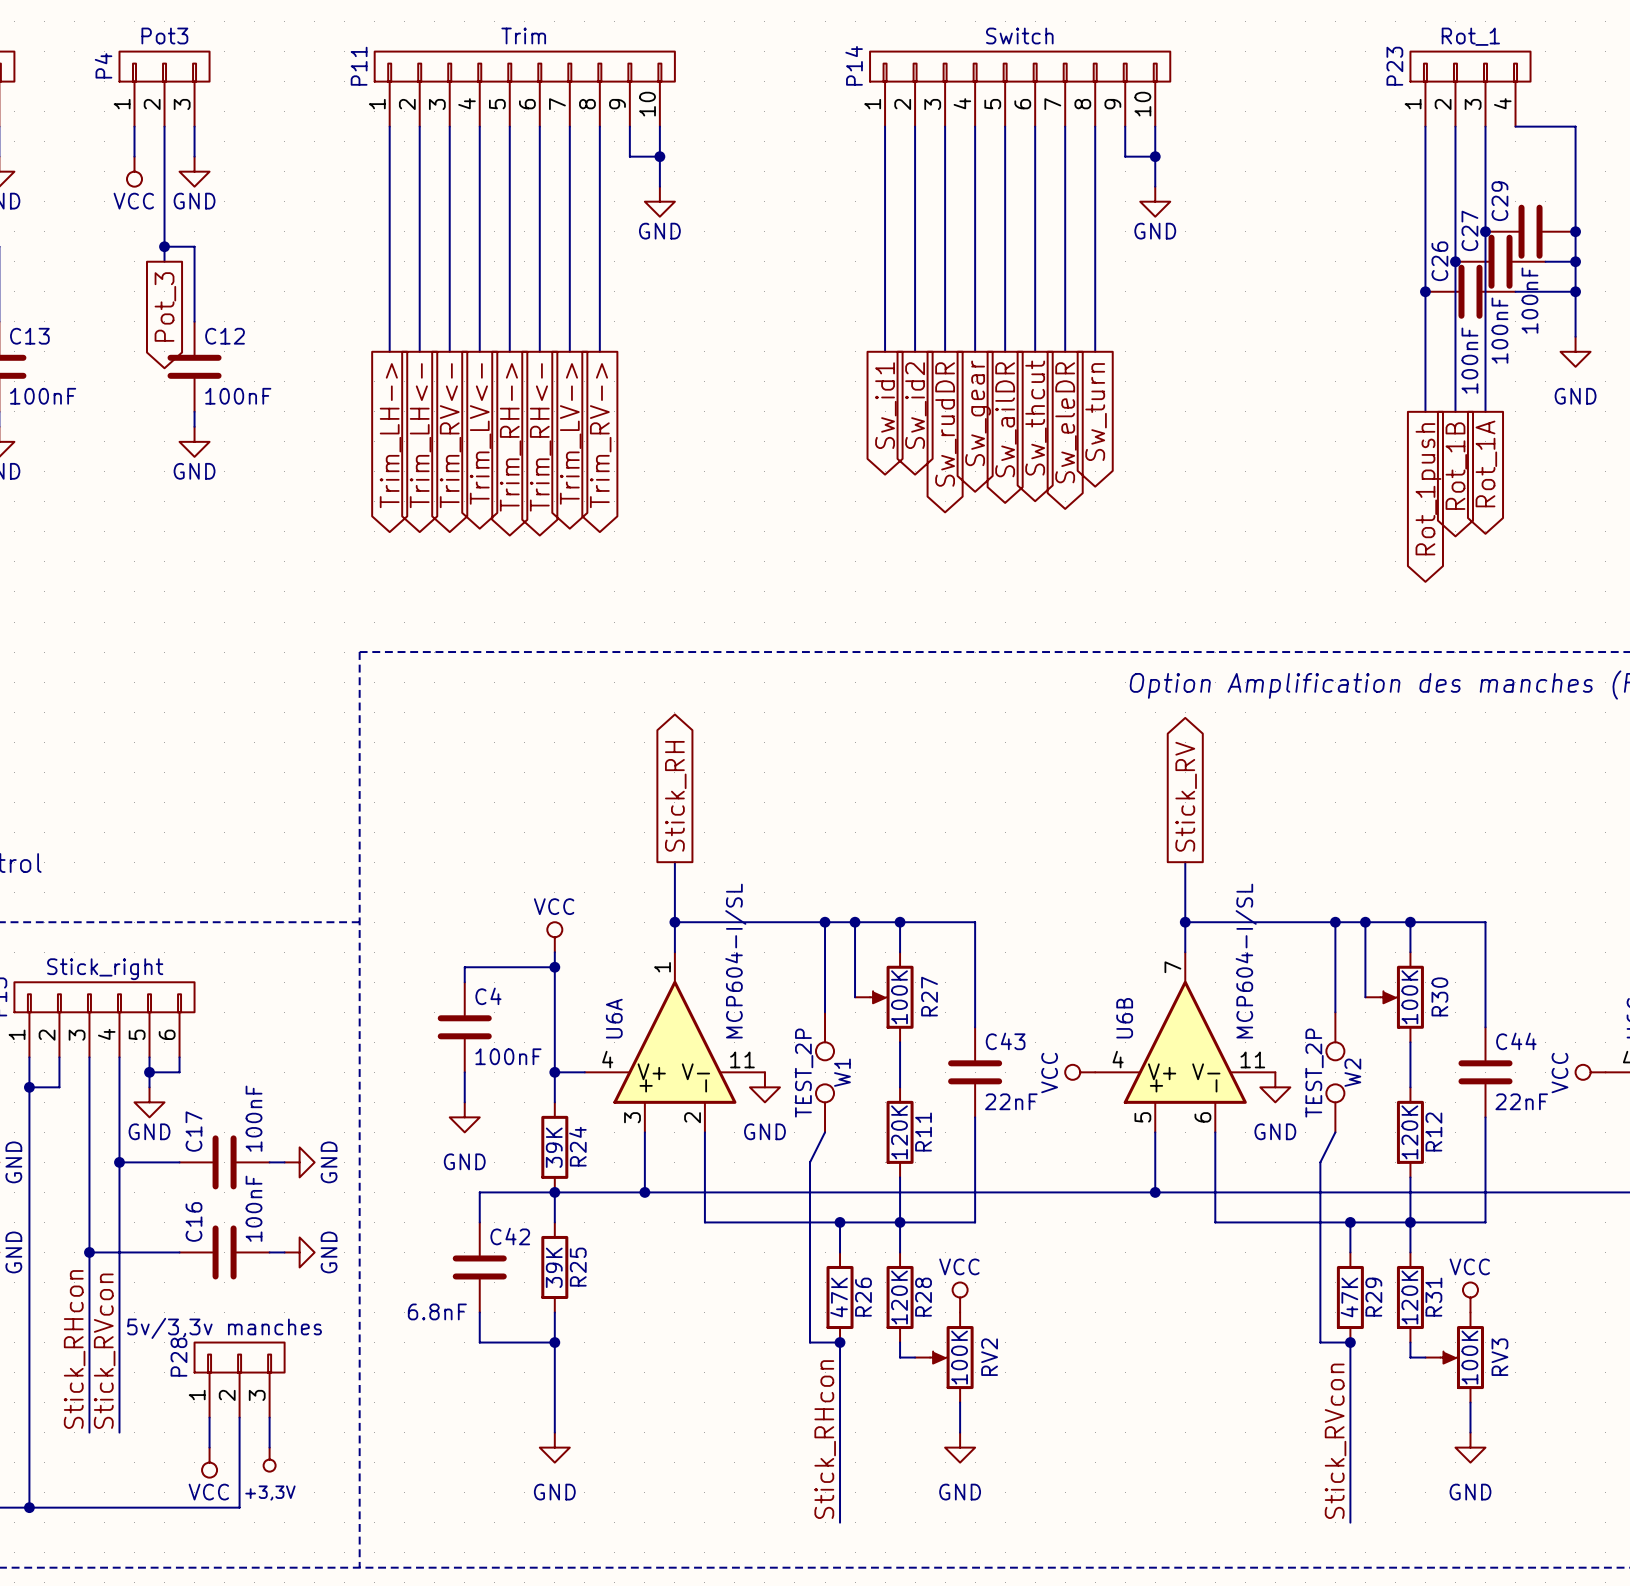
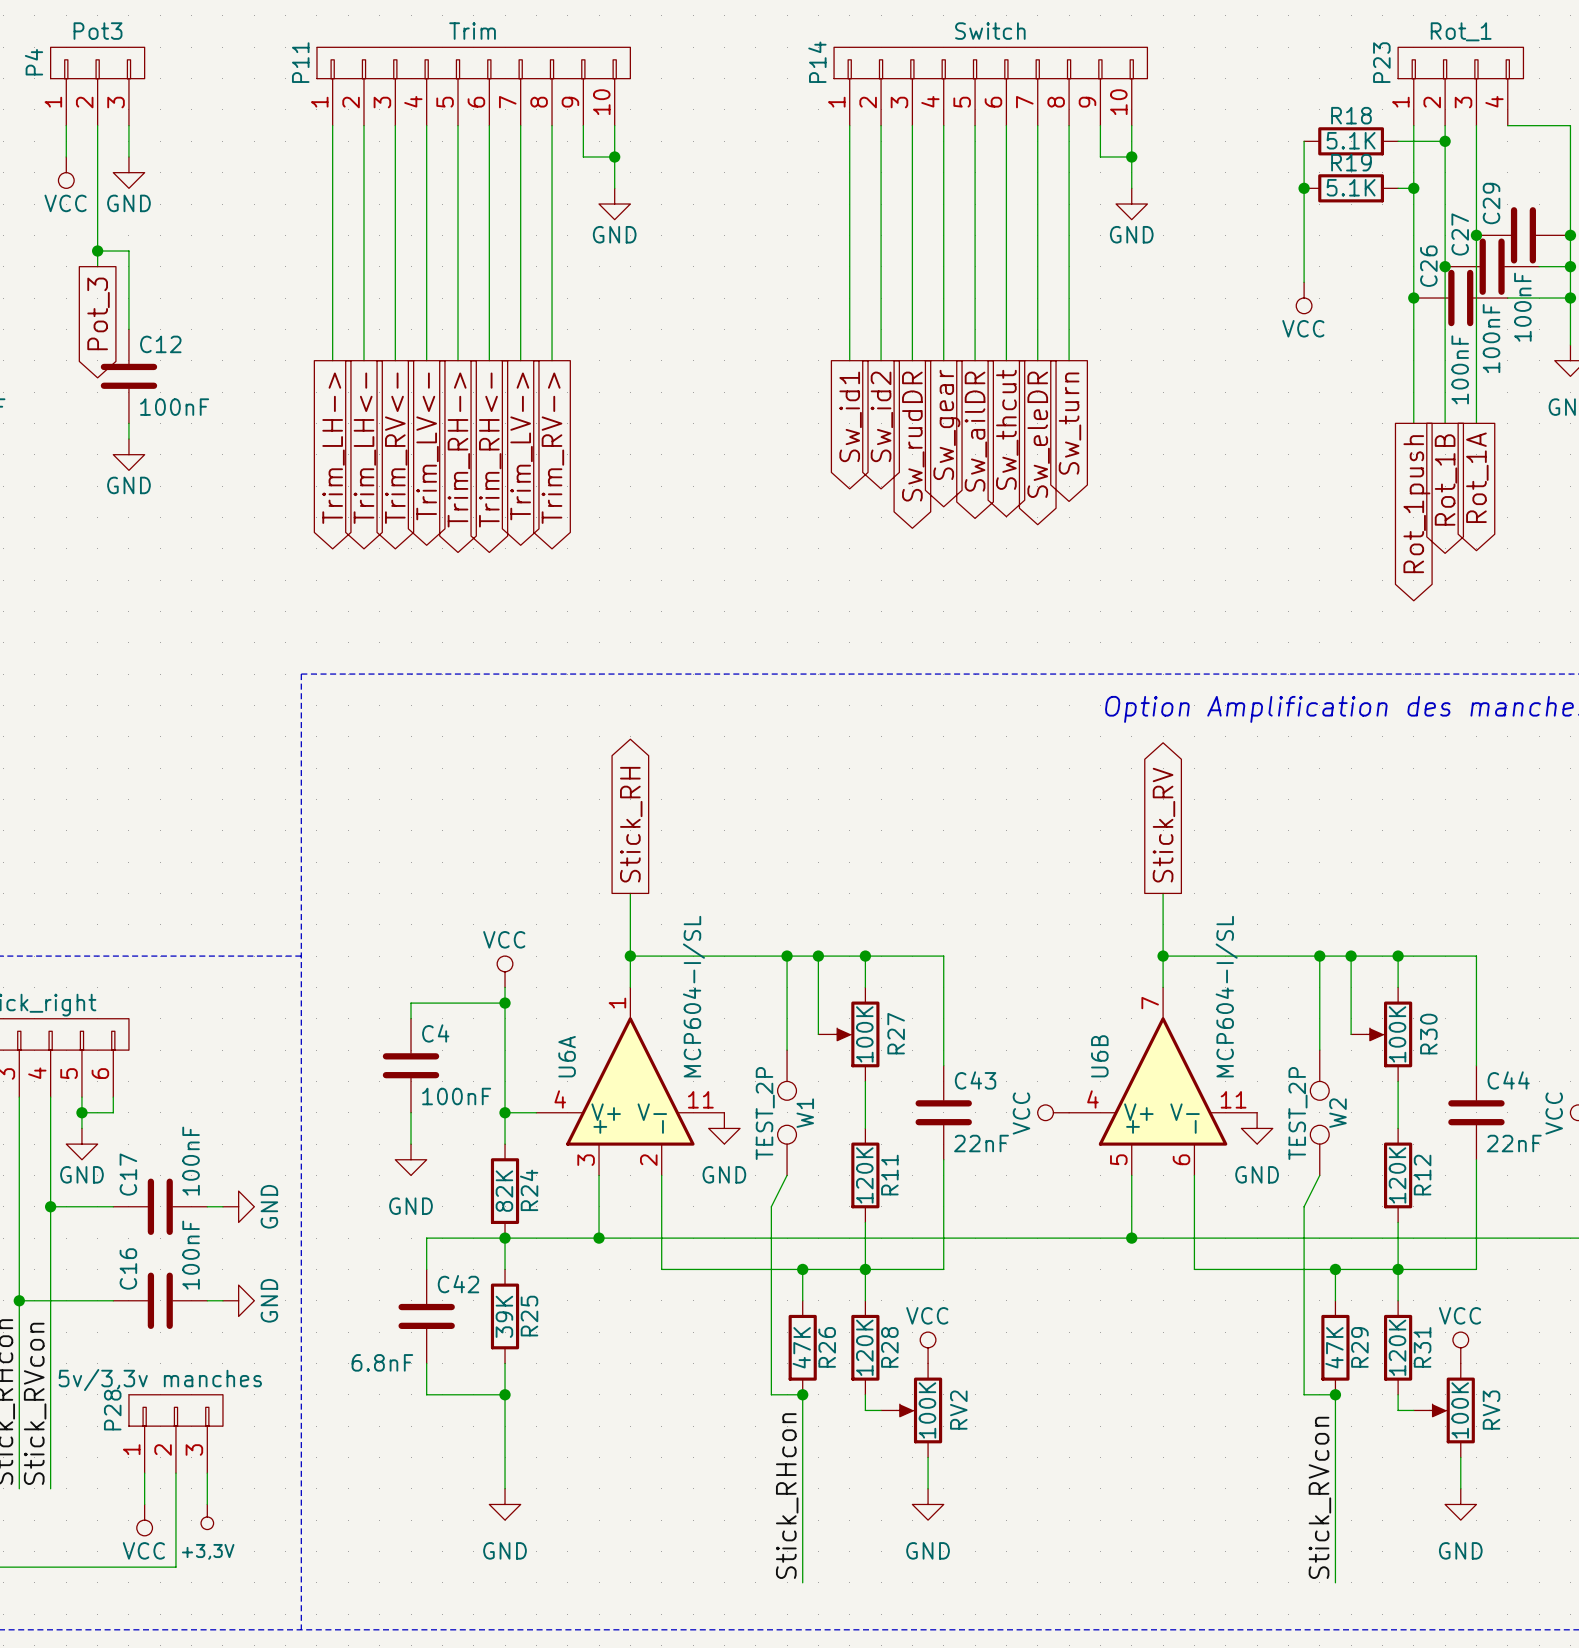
wire: none -> (1304, 141) (1304, 282)
R18: none -> 5.1K (1351, 141)
wire: none -> (1398, 141) (1445, 141)
junction: none -> (1445, 141)
junction: none -> (1304, 188)
R19: none -> 5.1K (1351, 188)
wire: none -> (1398, 188) (1413, 188)
junction: none -> (1413, 188)
power symbol: none -> VCC (1304, 298)
R24 value: 39K (554, 1147) -> 82K (504, 1191)

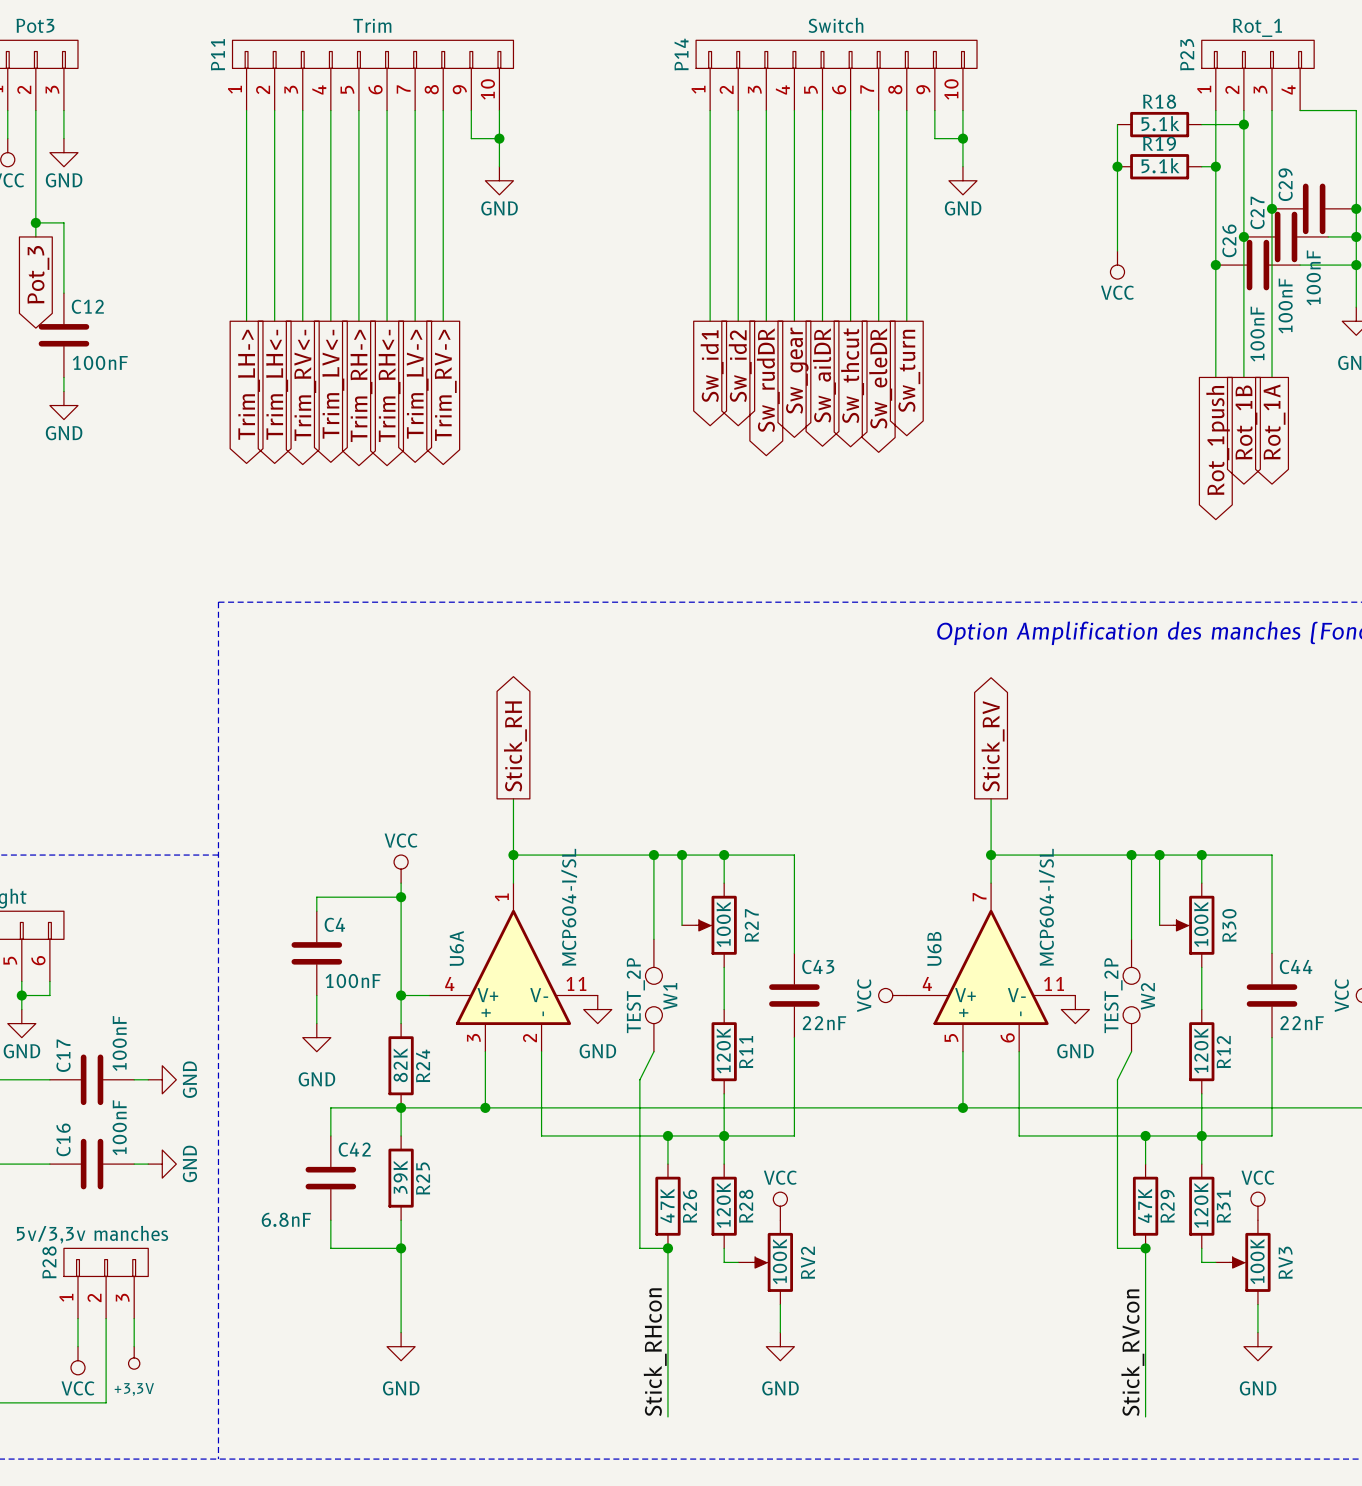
R18 value: 5.1K (1351, 140) -> 5.1k (1160, 123)
R19 value: 5.1K (1351, 187) -> 5.1k (1160, 165)

